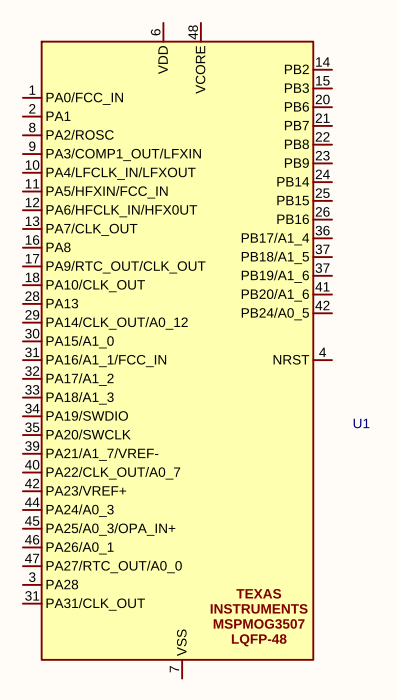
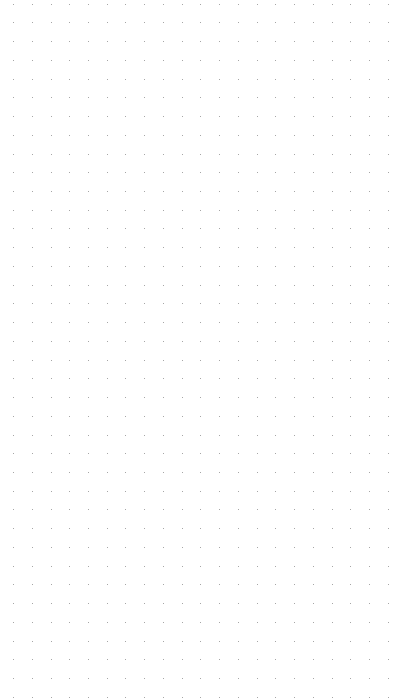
U1: (177, 350) -> none

